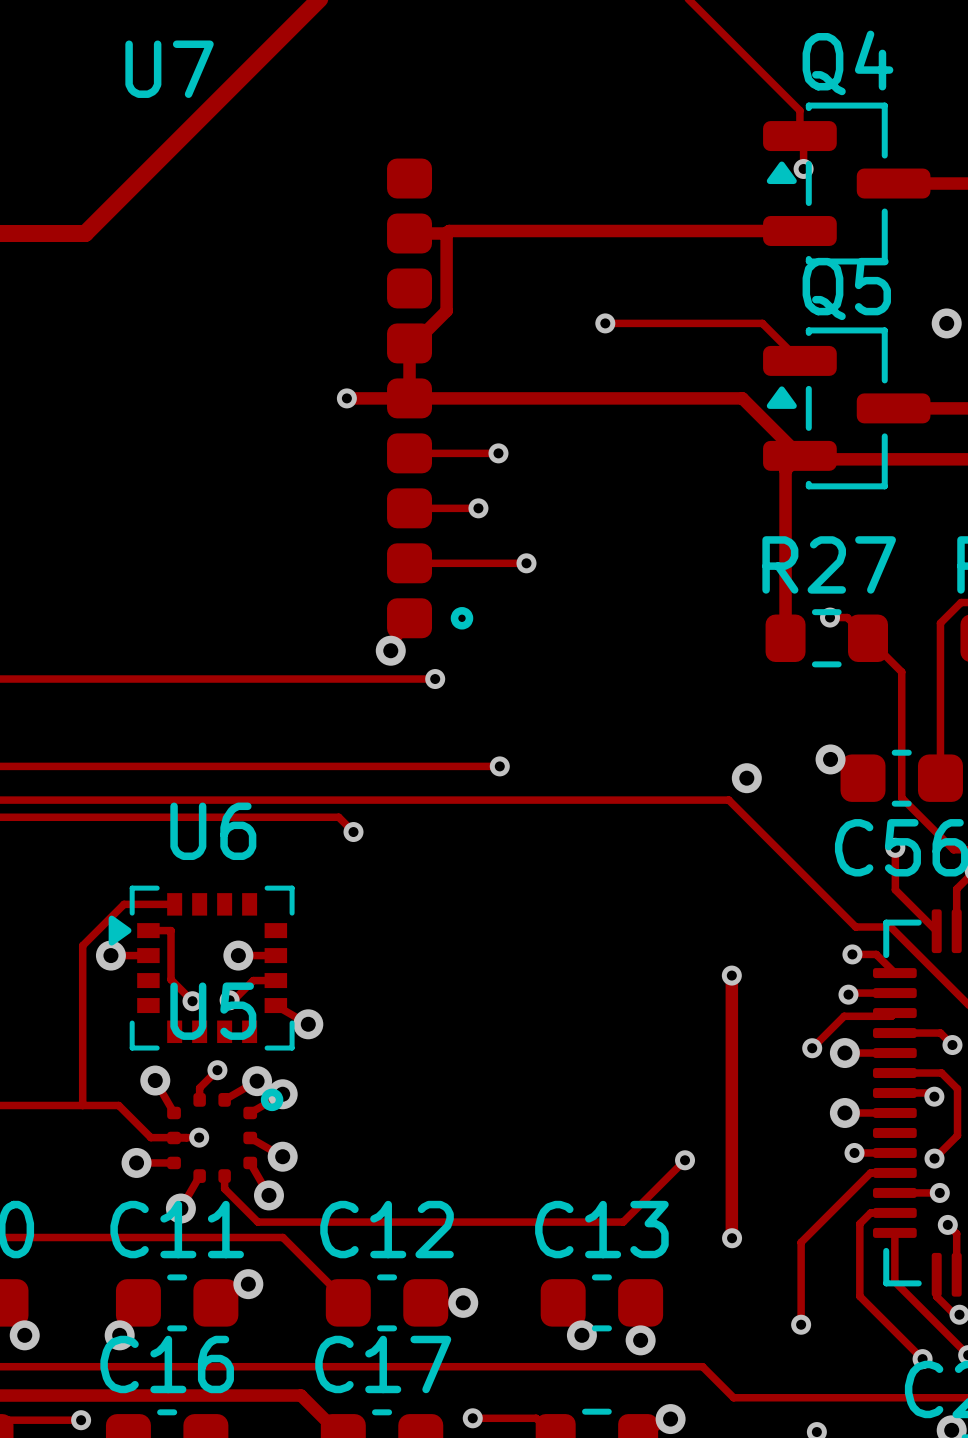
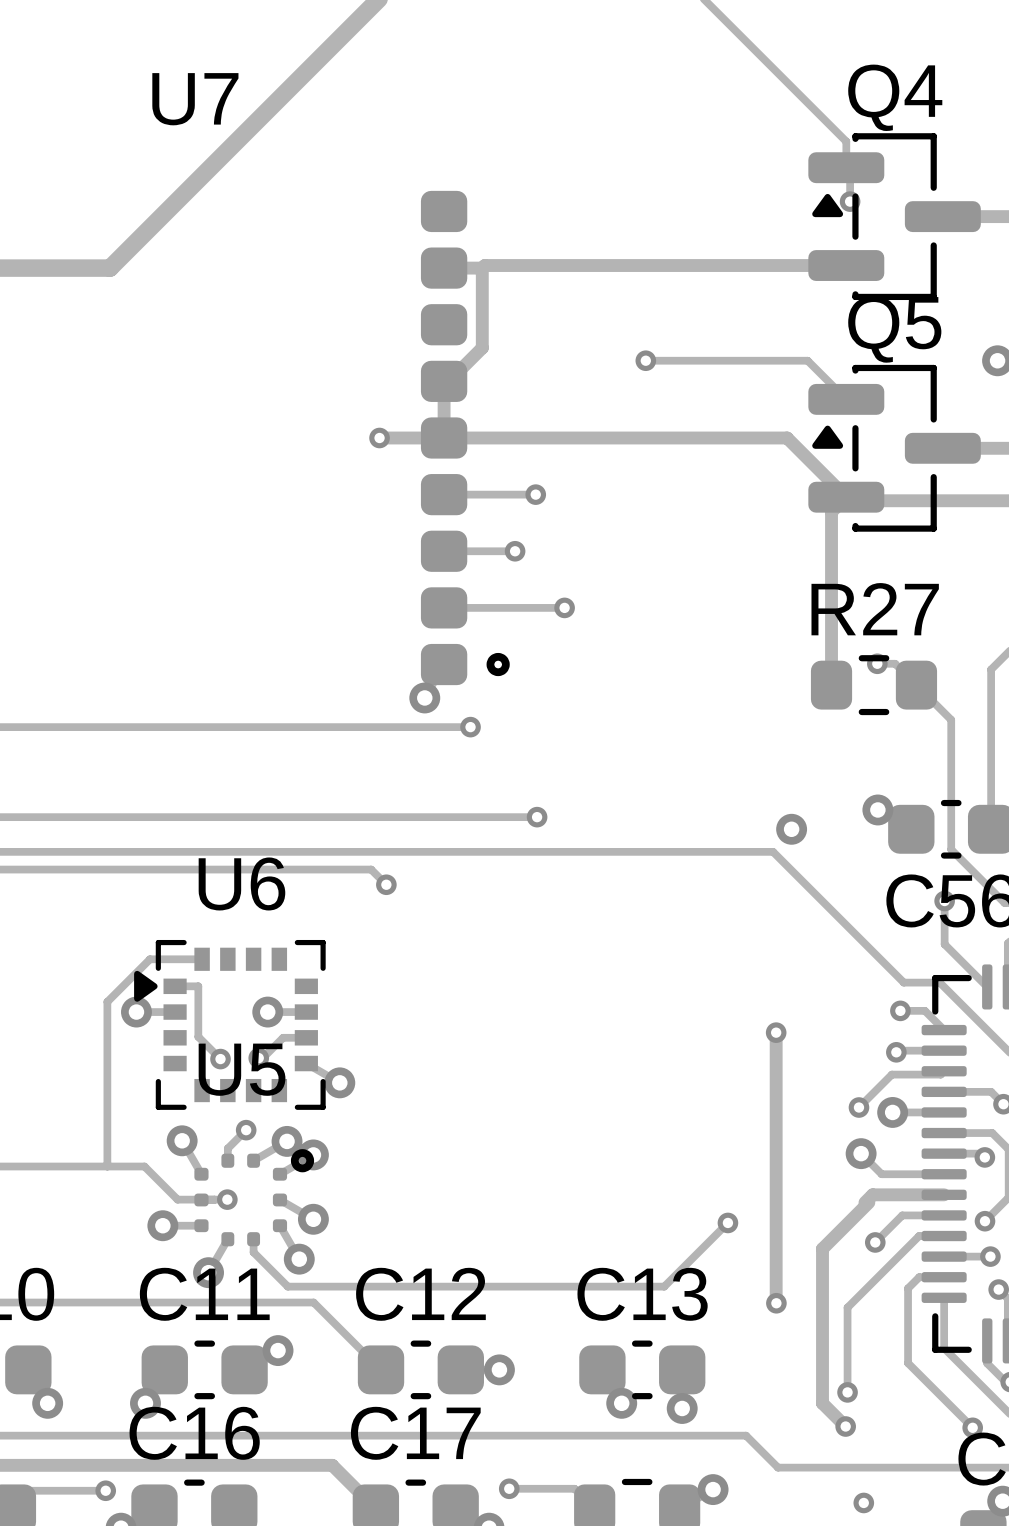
track: none -> (861, 1153) (881, 1174) (892, 1174)
via position: (844, 1112) -> (861, 1153)
track: none -> (944, 1194) (872, 1194) (864, 1202)
track: none -> (868, 1202) (822, 1248) (822, 1403) (845, 1426)
track: none -> (902, 1215) (875, 1242)
via position: (854, 1152) -> (875, 1242)
via: none -> (845, 1426)

